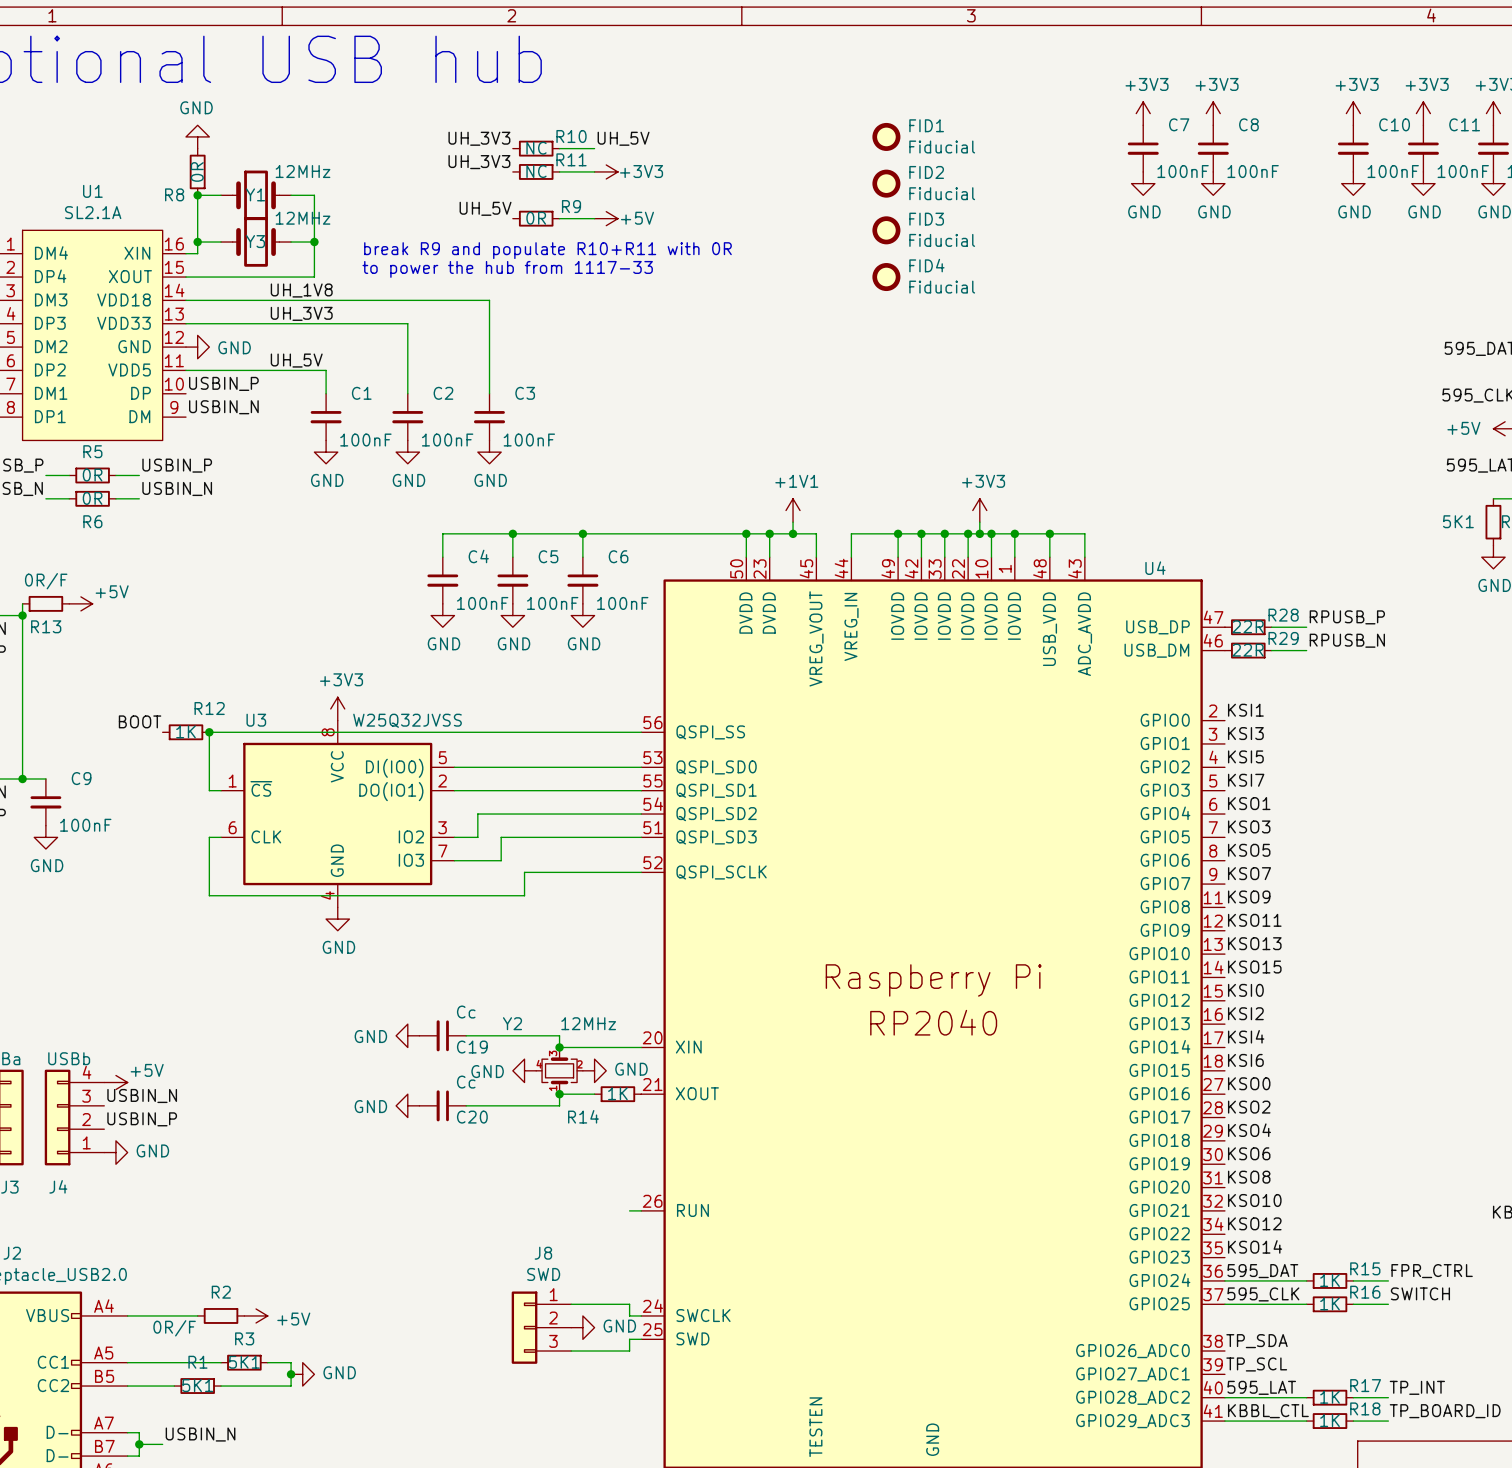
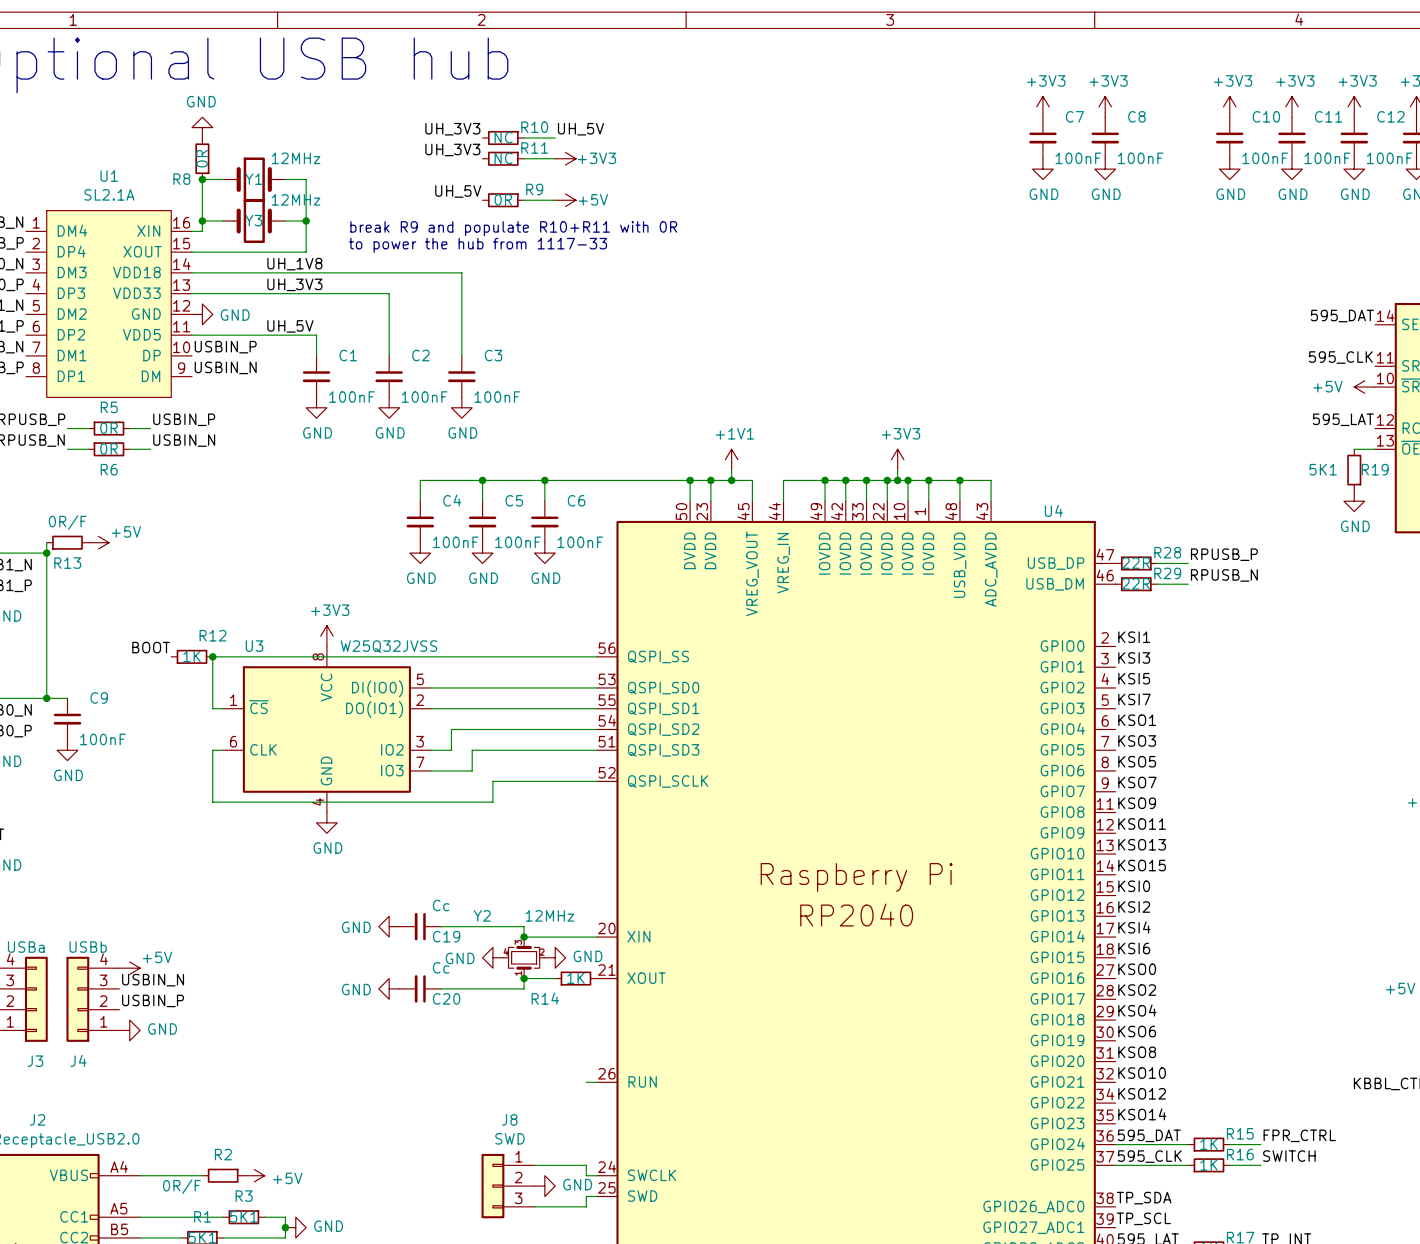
FID1: Fiducial (886, 136) -> none
FID2: Fiducial (886, 183) -> none
FID3: Fiducial (886, 230) -> none
FID4: Fiducial (886, 277) -> none

